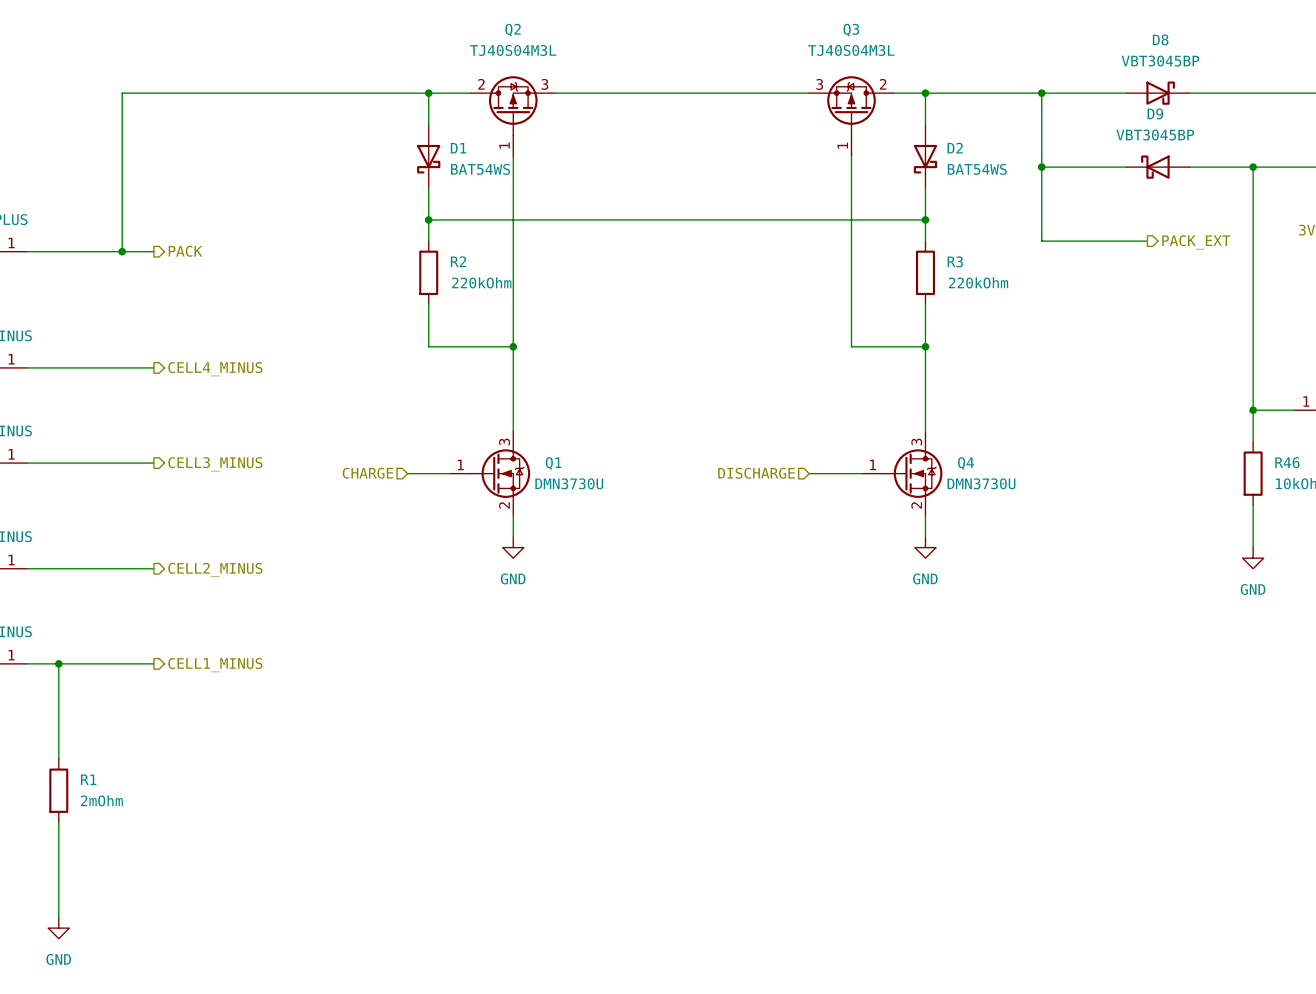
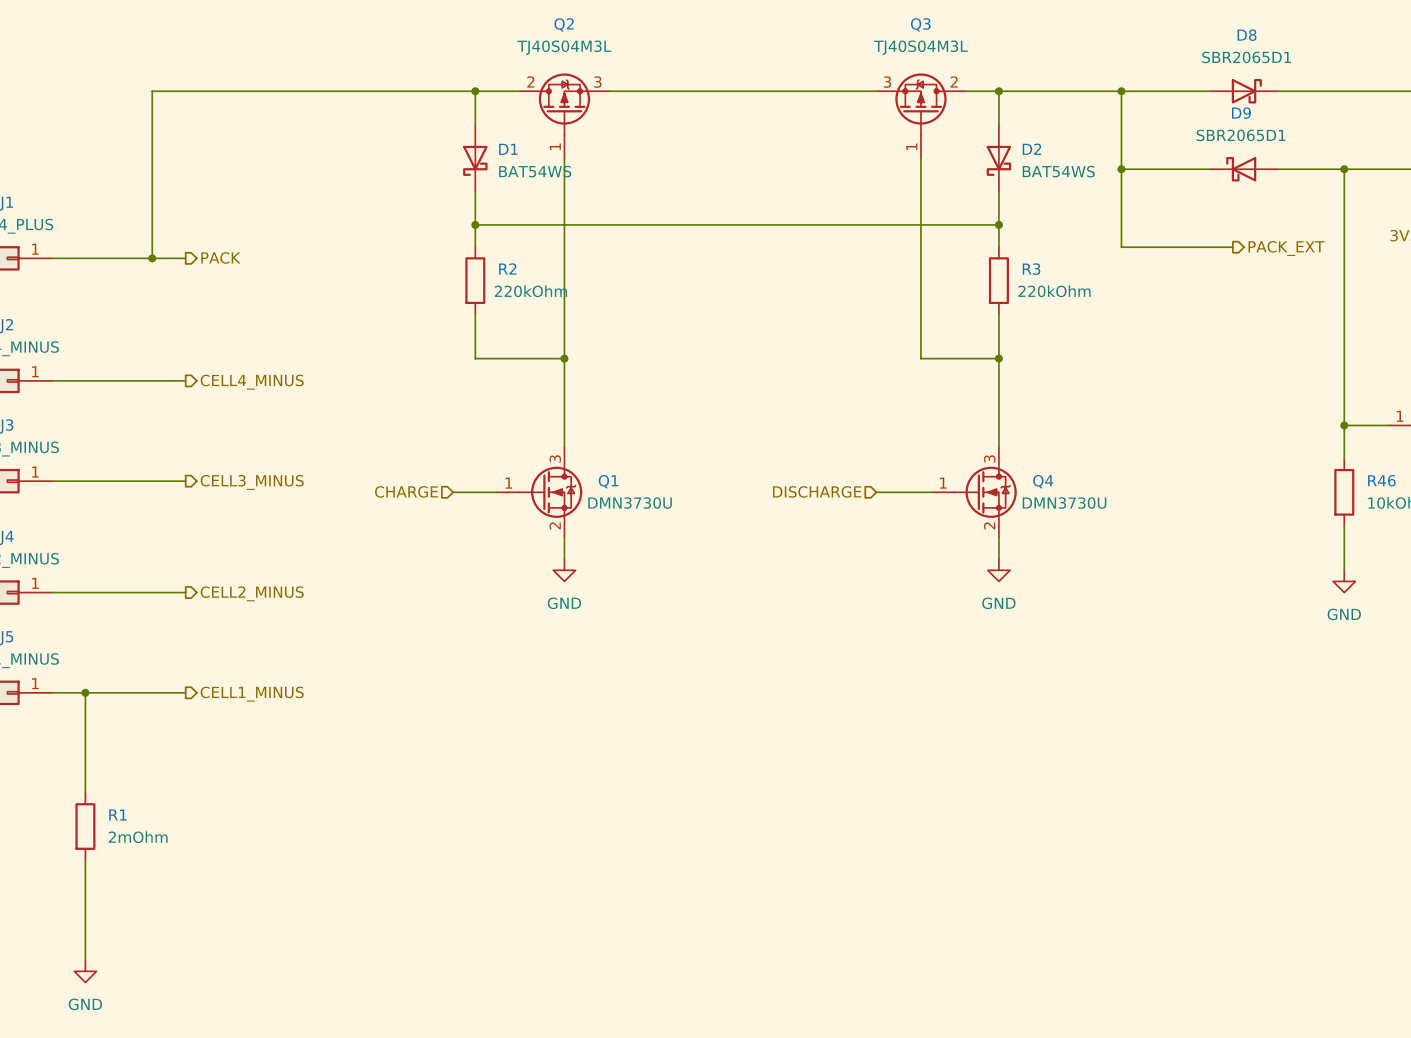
D8 value: VBT3045BP (1160, 61) -> SBR2065D1 (1246, 57)
D9 value: VBT3045BP (1155, 135) -> SBR2065D1 (1241, 135)

